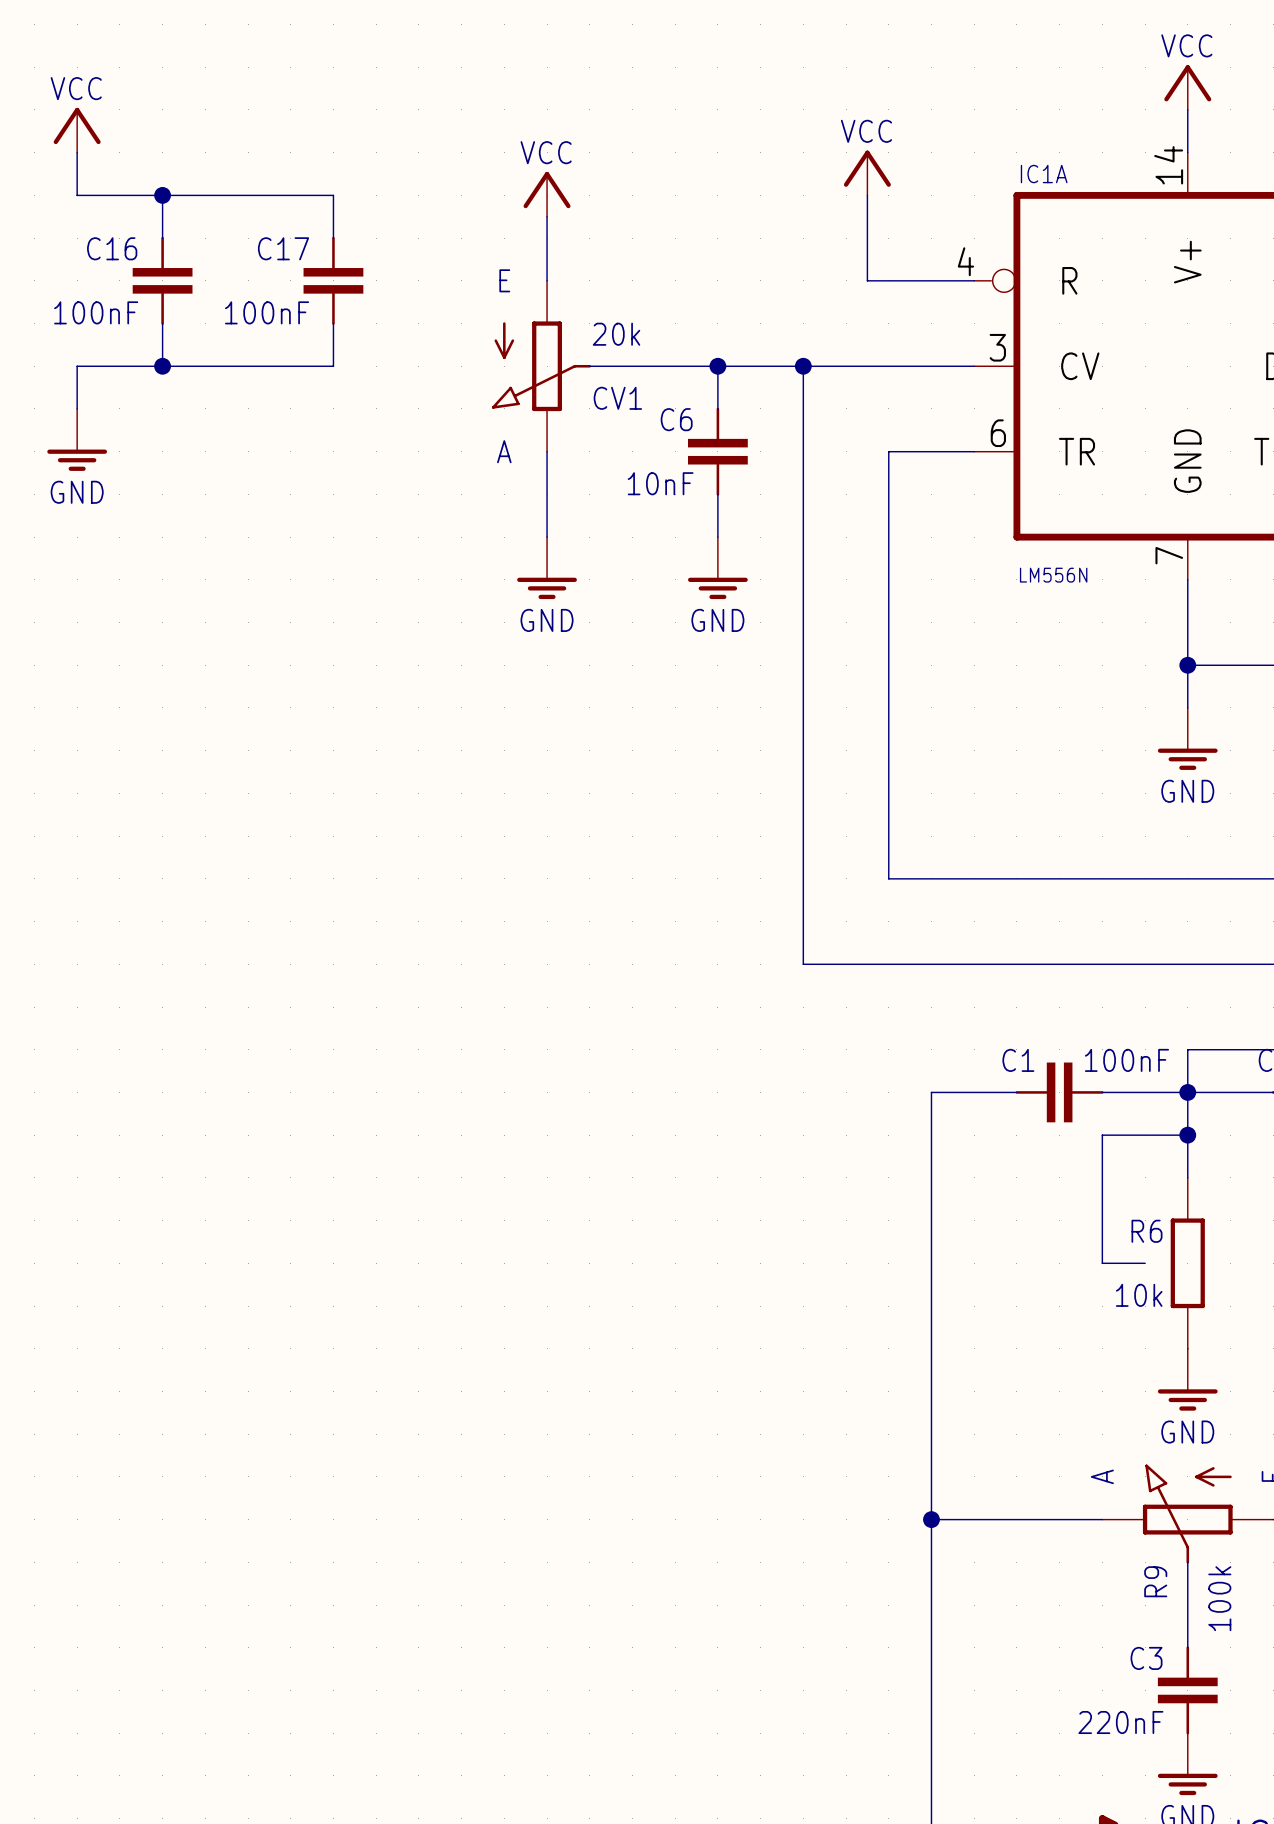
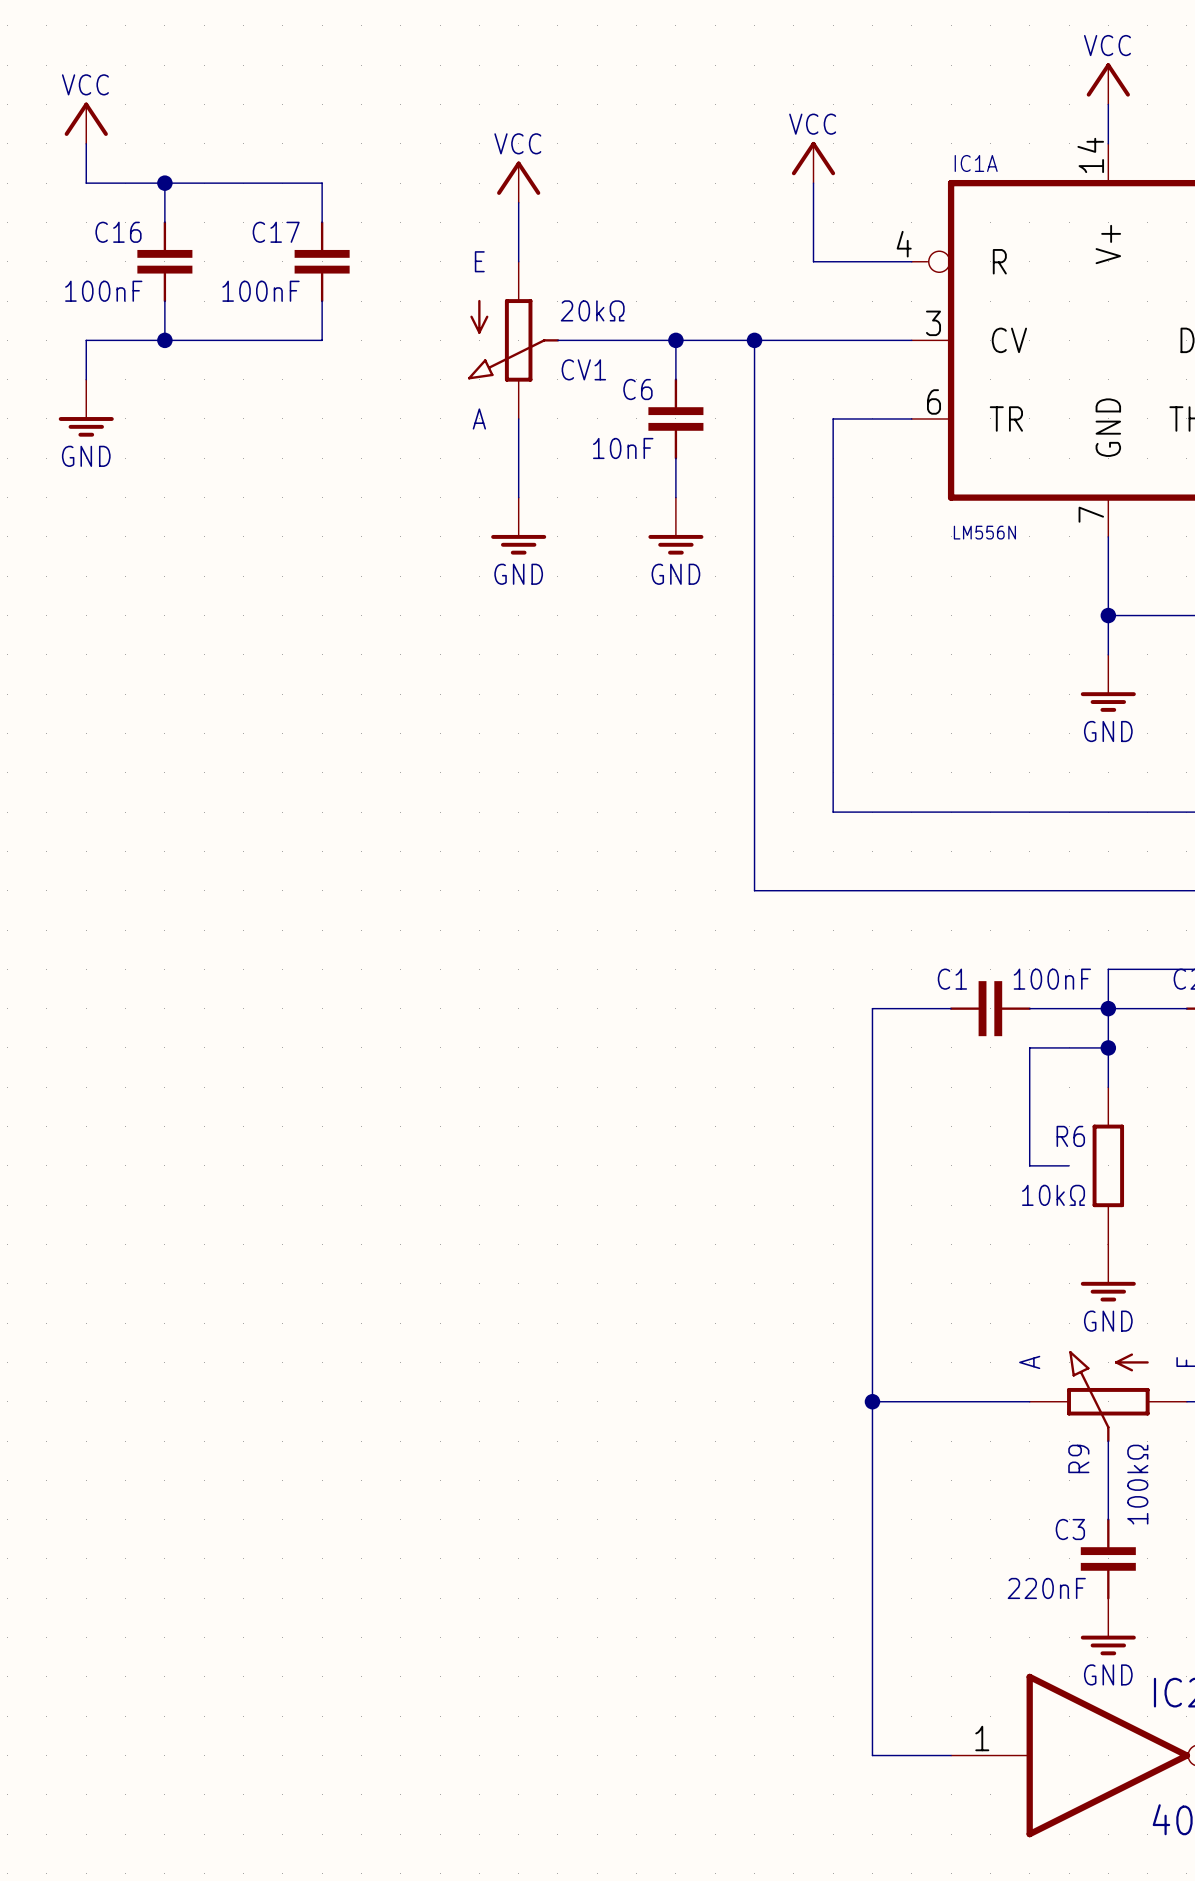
CV1 value: 20k (616, 334) -> 20kΩ (592, 310)
R6 value: 10k (1139, 1295) -> 10kΩ (1053, 1195)
R9 value: 100k (1219, 1598) -> 100kΩ (1137, 1484)

